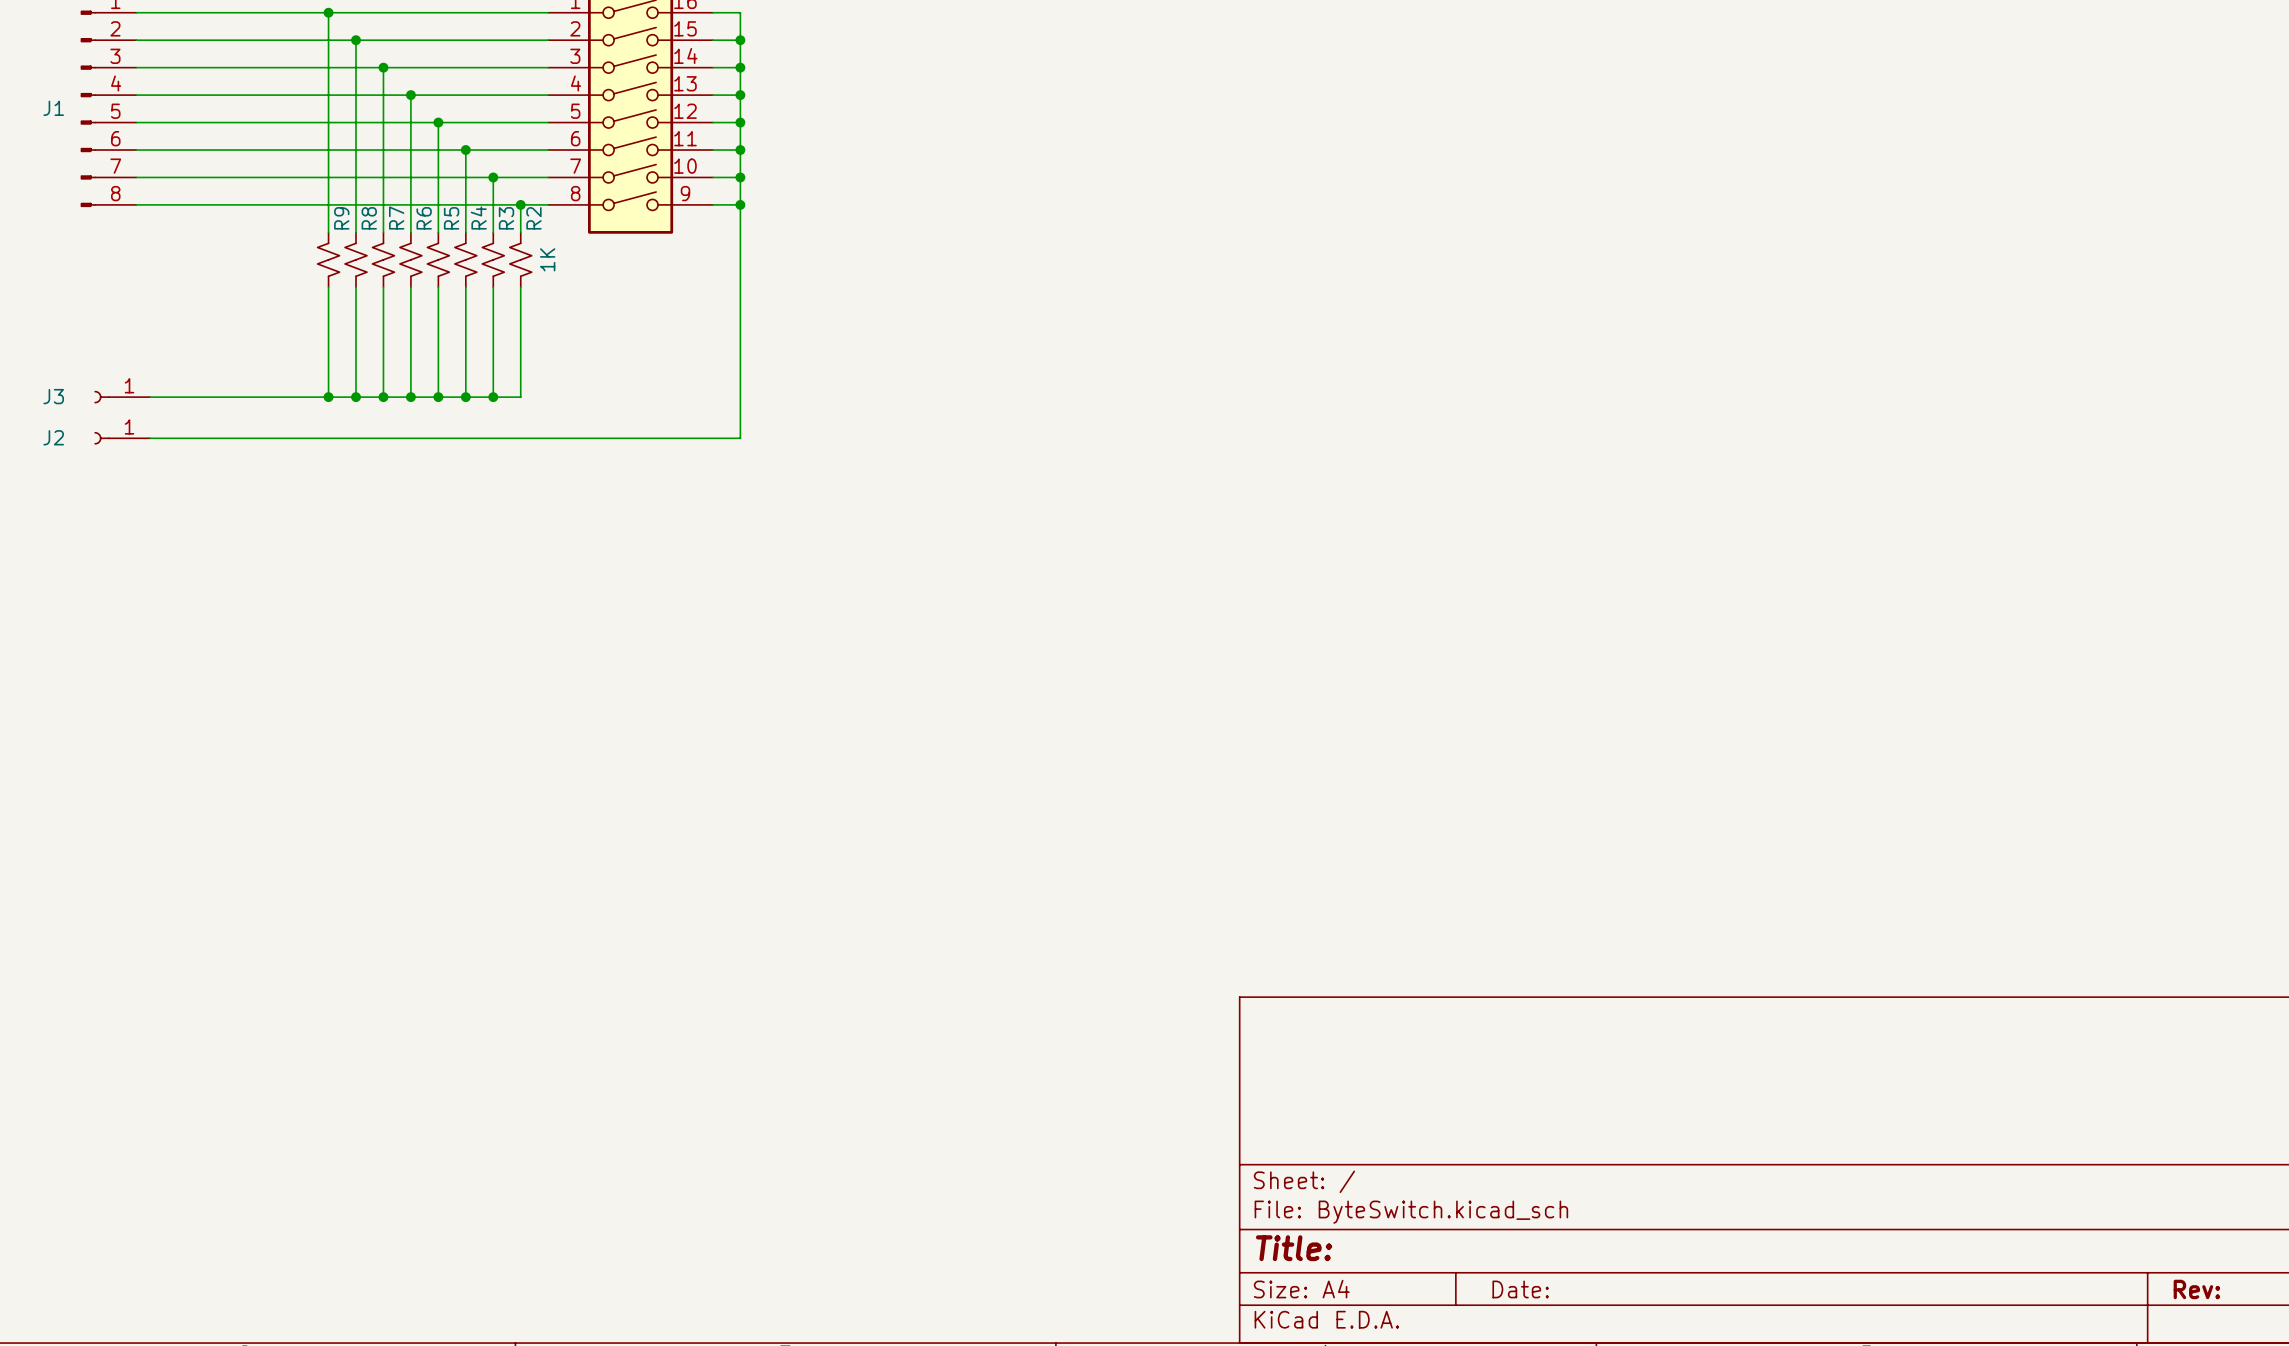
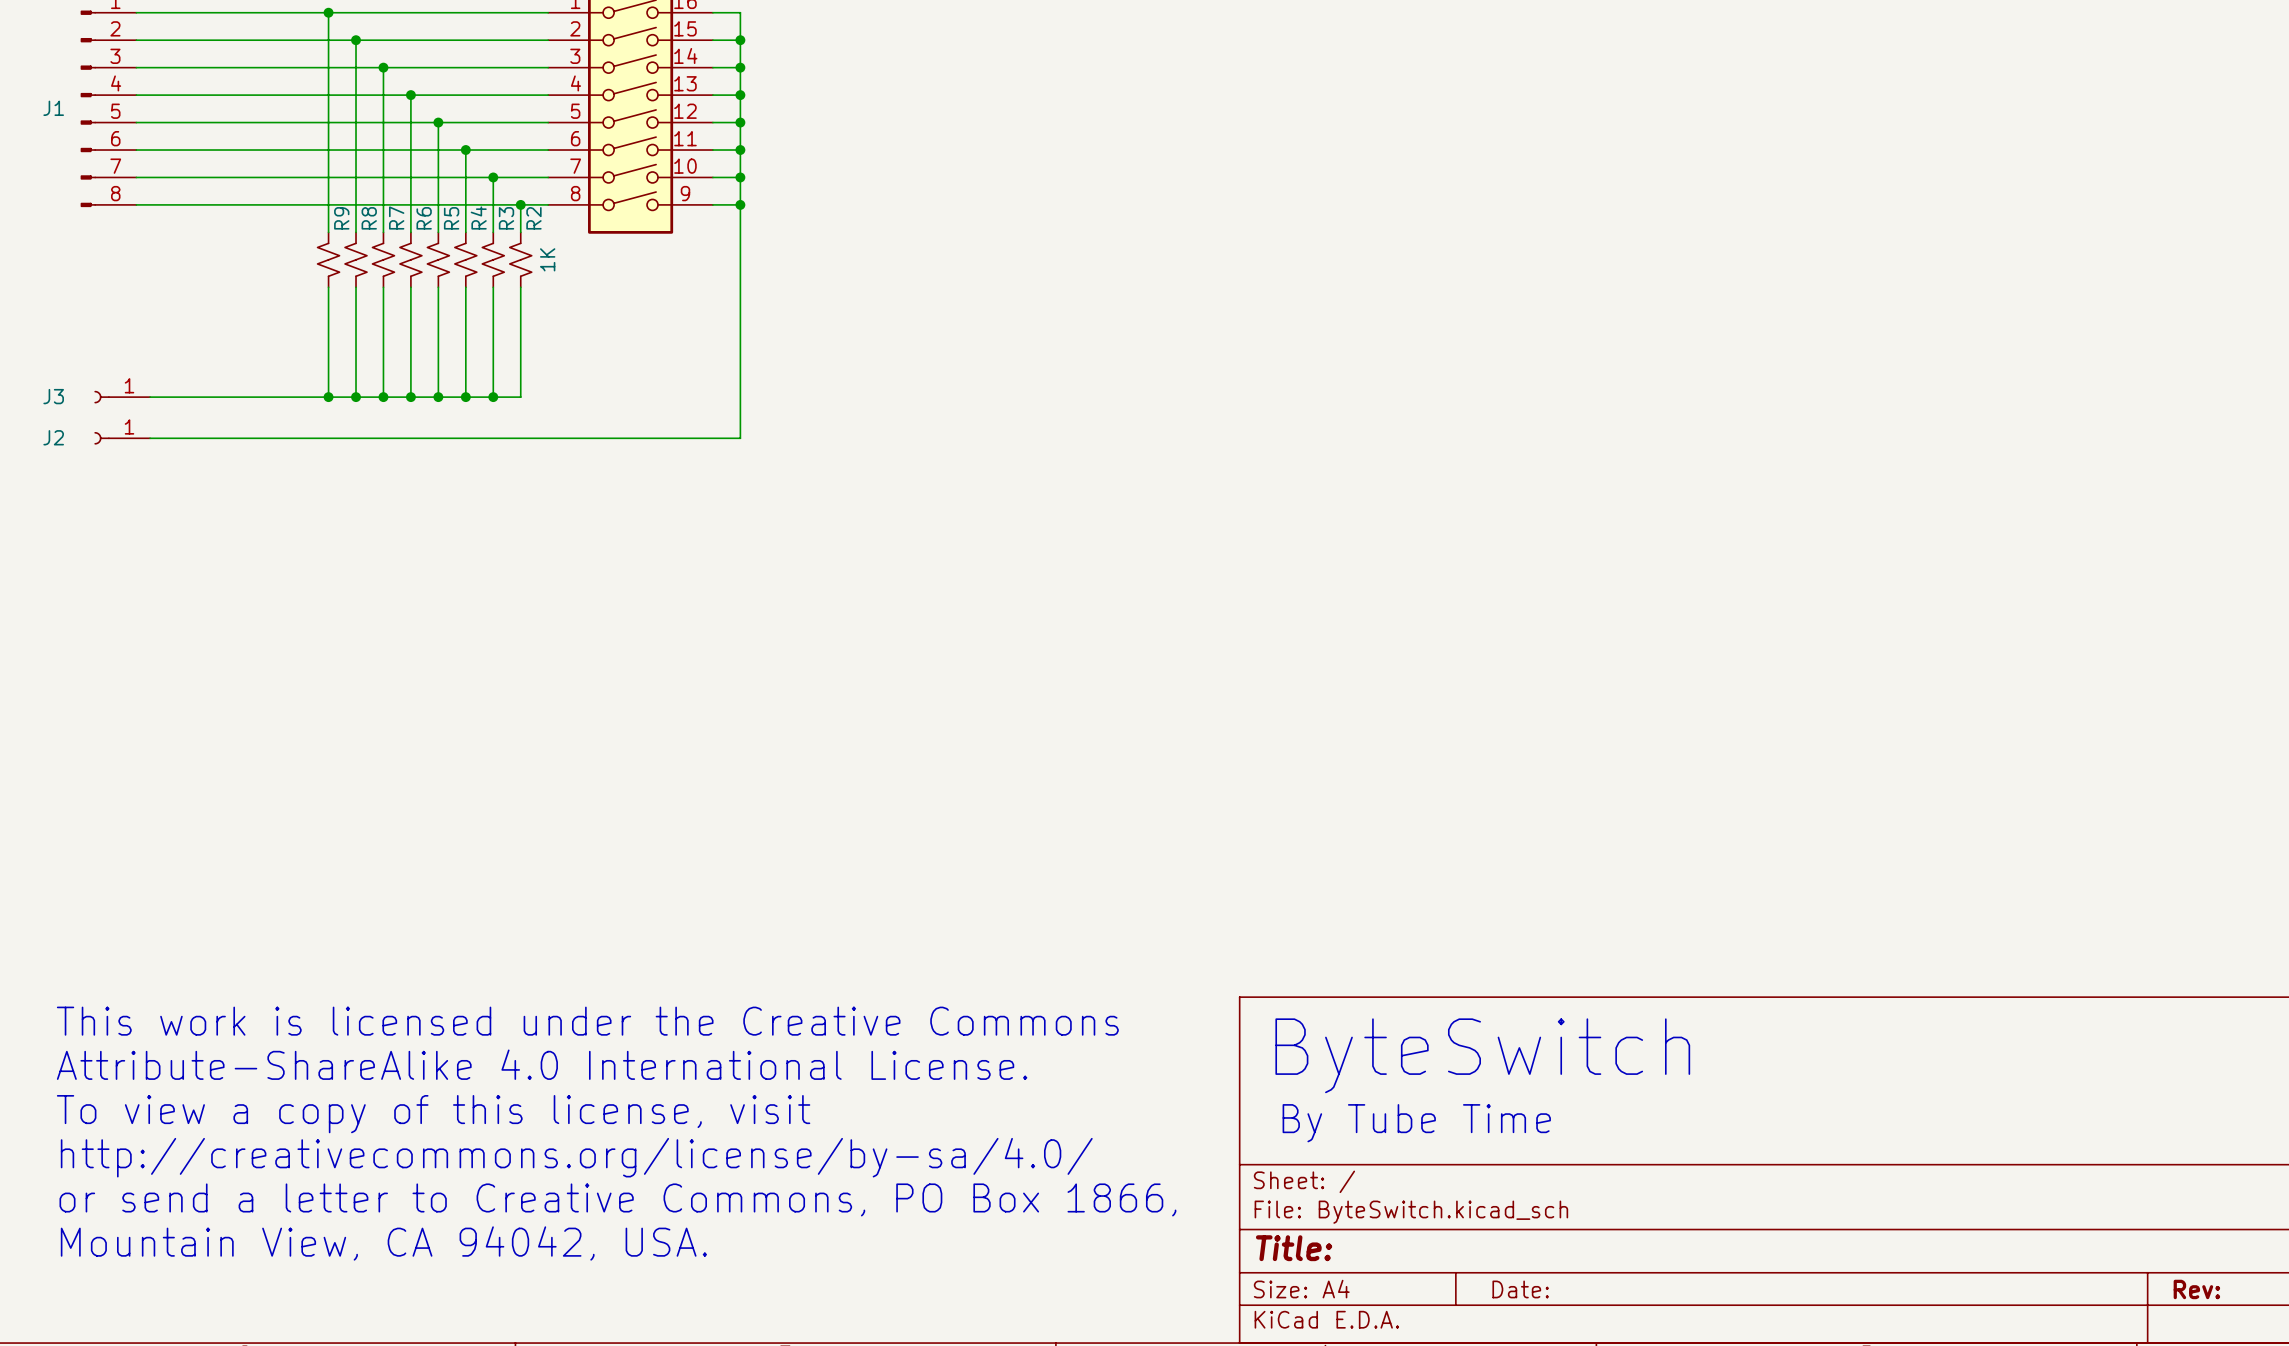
text: none -> This work is licensed under the Creative Commons (587, 1021)
text: none -> ByteSwitch (1482, 1055)
text: none -> Attribute-ShareAlike 4.0 International License. (542, 1064)
text: none -> To view a copy of this license, visit (433, 1114)
text: none -> By Tube Time (1416, 1123)
text: none -> http://creativecommons.org/license/by-sa/4.0/ (576, 1157)
text: none -> or send a letter to Creative Commons, PO Box 1866, (617, 1199)
text: none -> Mountain View, CA 94042, USA. (383, 1243)

